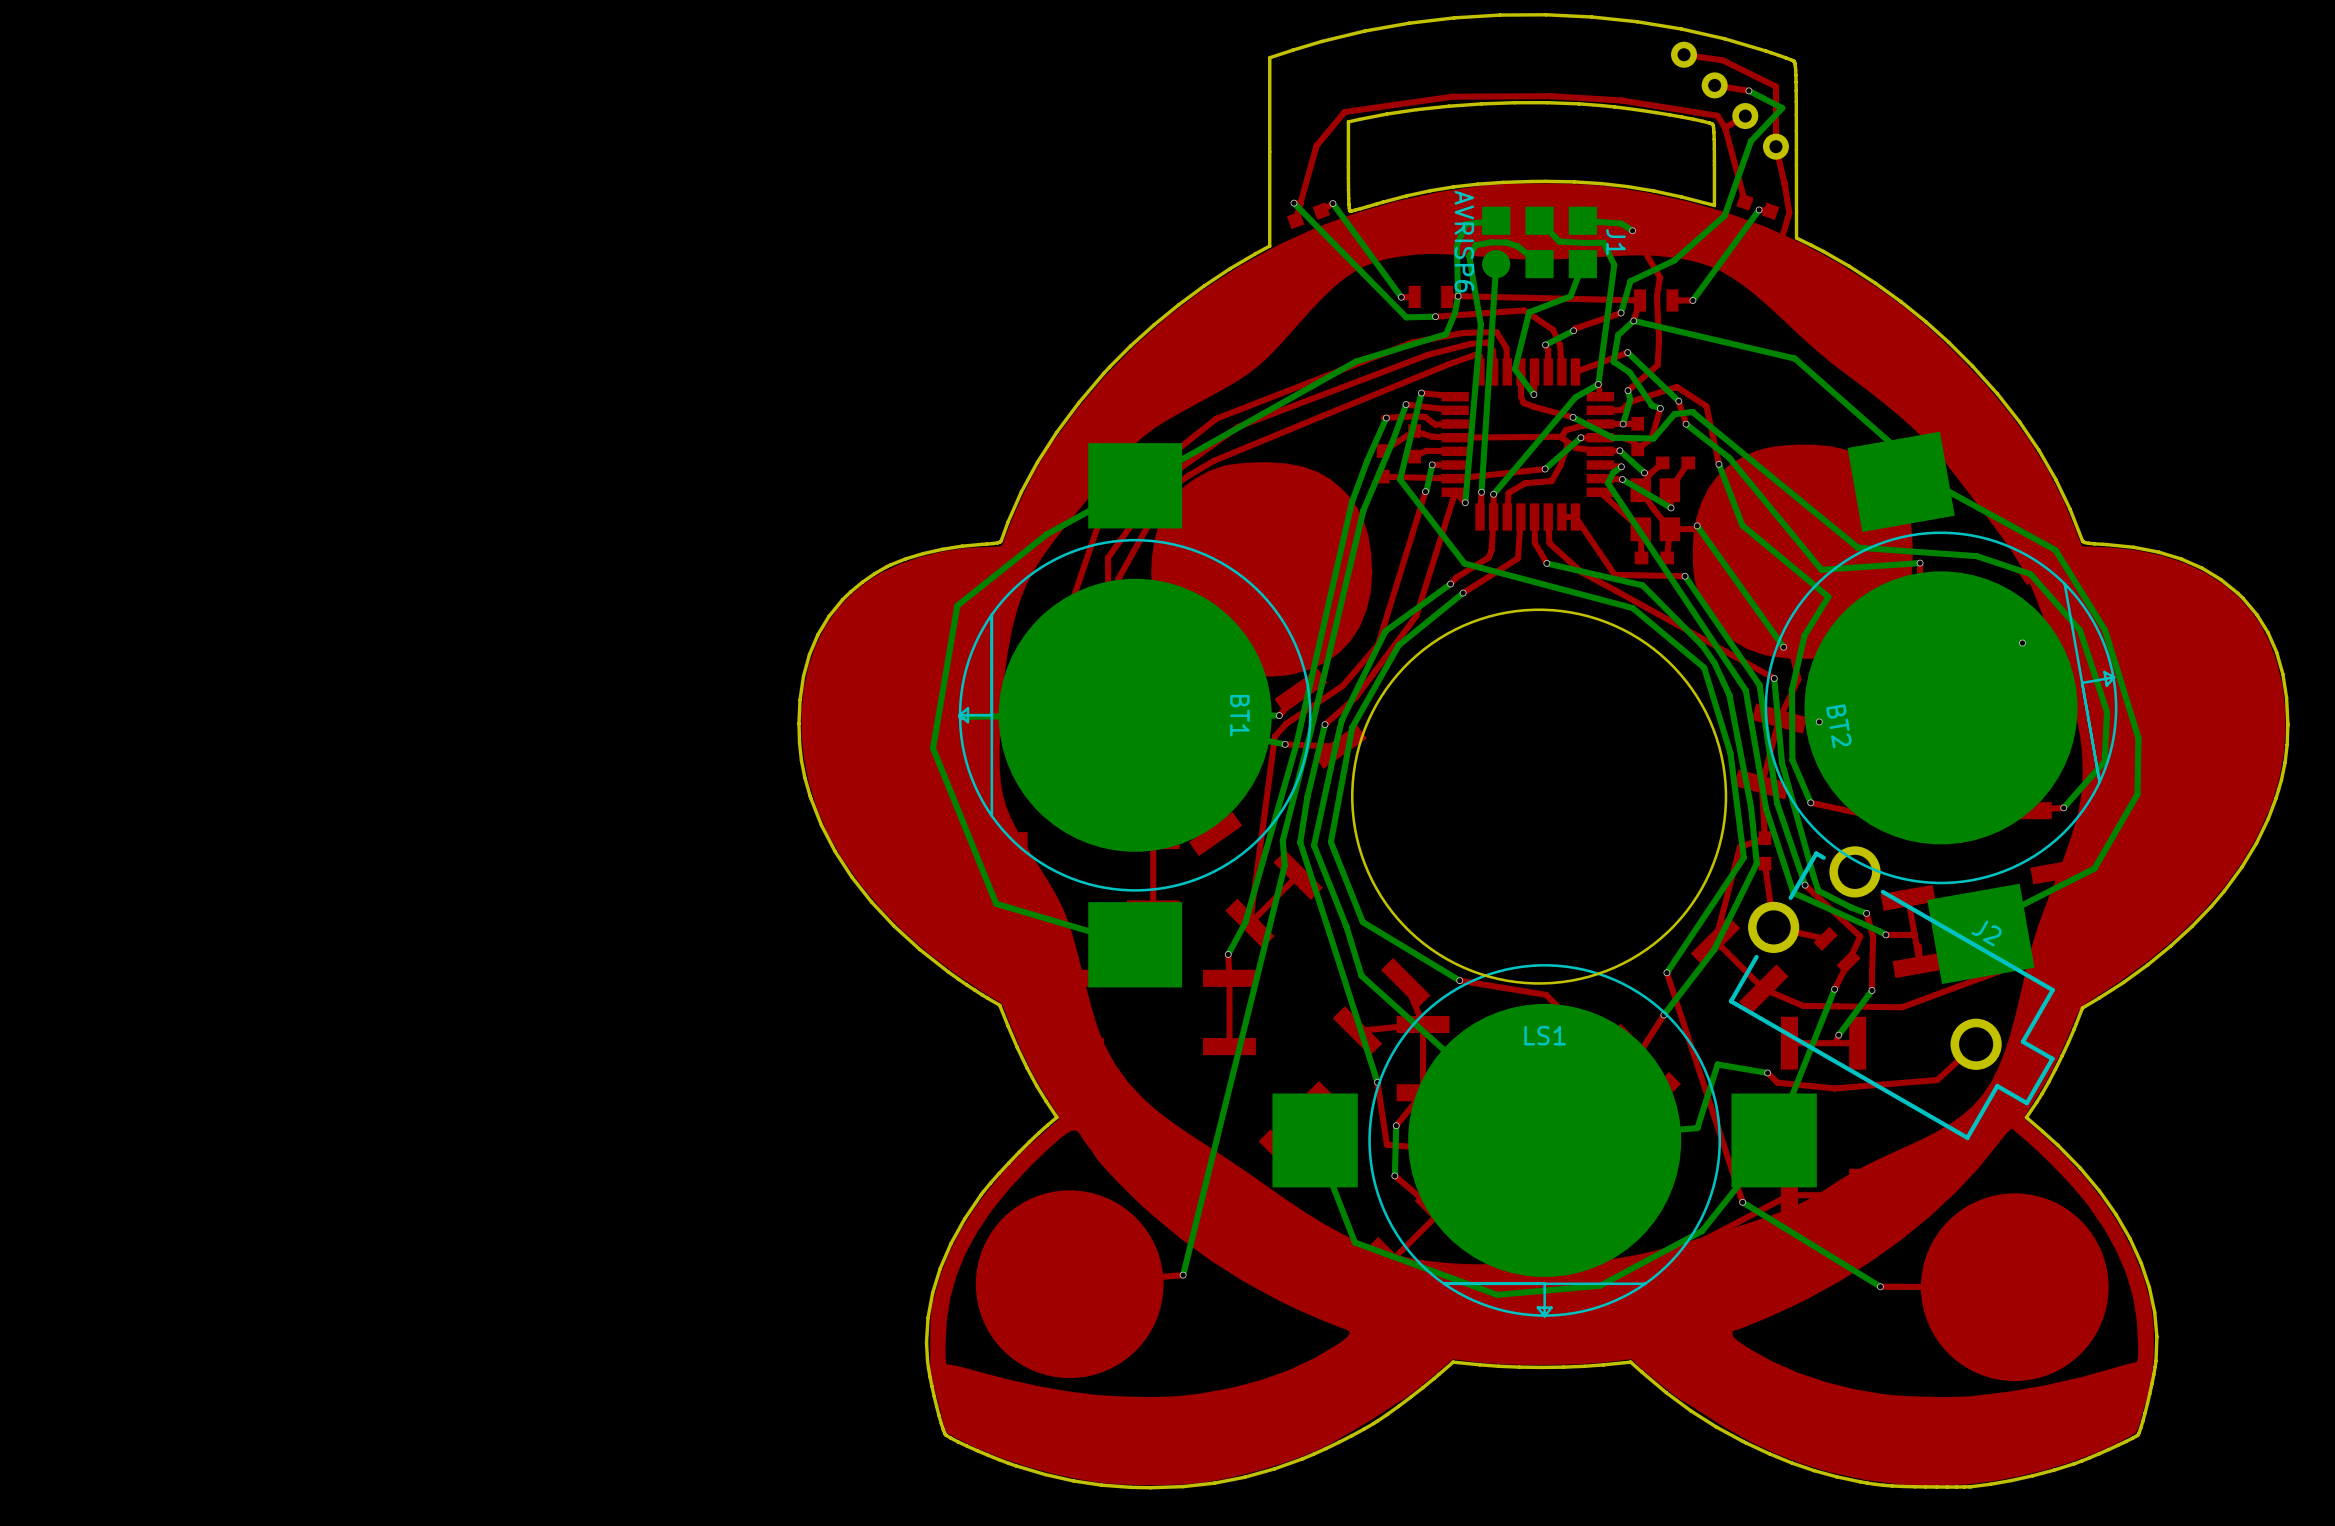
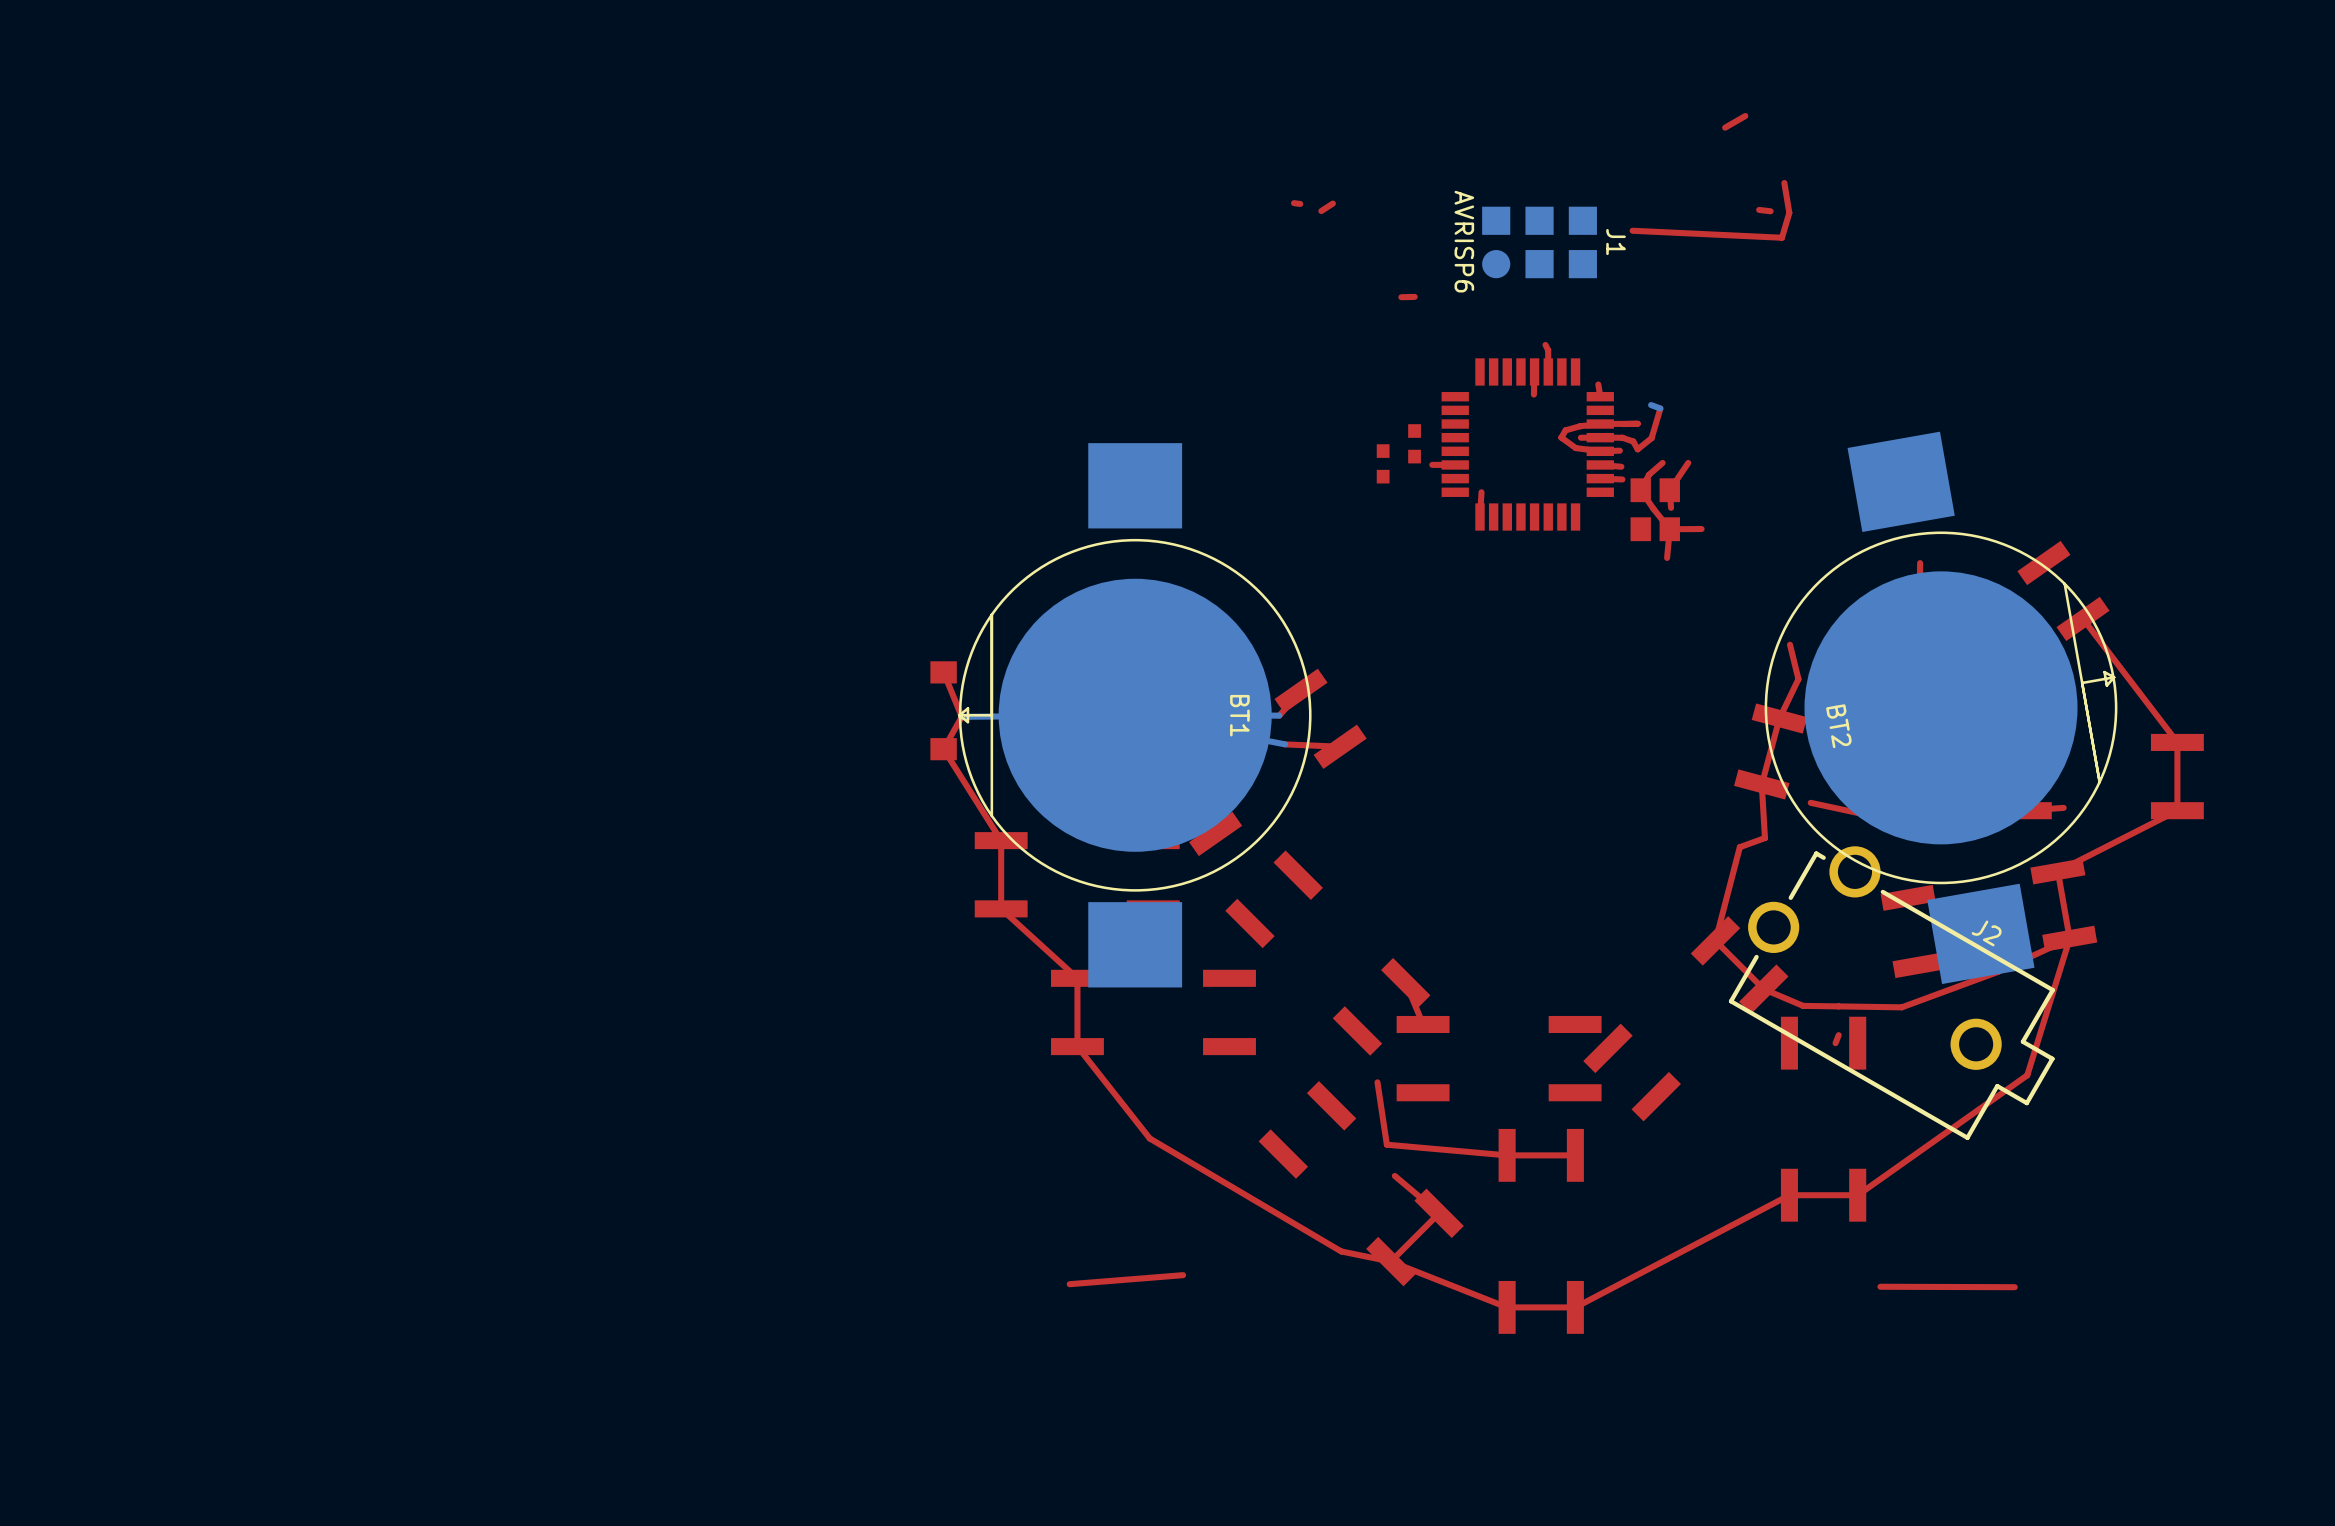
drawing: [797, 13, 2290, 1490] -> none
top track: (1684, 54) (1722, 60) (1776, 86) (1775, 146) (1785, 187) -> none
part: (1684, 54) -> none
top track: (1714, 85) (1748, 90) -> none
part: (1714, 85) -> none
bottom track: (1748, 90) (1782, 108) (1750, 141) (1724, 215) (1674, 260) (1630, 281) (1621, 313) -> none
via: (1748, 90) -> none
part: (1745, 116) -> none
part: (1775, 146) -> none
top track: (1744, 201) (1725, 127) (1717, 115) (1621, 100) (1551, 96) (1452, 96) (1344, 112) (1316, 145) (1295, 220) -> none
bottom track: (1293, 203) (1406, 317) (1435, 316) -> none
via: (1293, 203) -> none
bottom track: (1332, 203) (1401, 297) -> none
via: (1332, 203) -> none
part: (1757, 206) -> none
bottom track: (1759, 209) (1692, 300) -> none
via: (1759, 209) -> none
part: (1308, 215) -> none
bottom track: (1496, 220) (1465, 224) (1456, 246) (1458, 296) (1454, 313) (1446, 334) (1355, 361) (1046, 534) (957, 605) (933, 748) (996, 903) (1135, 944) -> none
bottom track: (1539, 220) (1559, 241) (1603, 242) (1614, 264) (1598, 384) (1575, 397) (1493, 494) -> none
bottom track: (1582, 220) (1621, 223) (1632, 230) -> none
via: (1632, 230) -> none
top track: (1633, 231) (1659, 277) (1656, 297) (1659, 339) (1657, 365) (1627, 390) -> none
bottom track: (1496, 264) (1481, 492) -> none
bottom track: (1539, 264) (1517, 246) (1506, 242) (1475, 245) (1469, 256) (1480, 324) (1465, 502) -> none
bottom track: (1582, 264) (1570, 296) (1529, 312) (1514, 369) (1533, 394) -> none
part: (1430, 296) -> none
top track: (1447, 296) (1640, 300) (1633, 320) -> none
via: (1458, 296) -> none
via: (1401, 297) -> none
part: (1656, 300) -> none
top track: (1692, 300) (1672, 300) -> none
via: (1692, 300) -> none
top track: (1621, 313) (1575, 328) -> none
via: (1621, 313) -> none
top track: (1435, 316) (1524, 310) (1553, 329) (1560, 345) (1561, 371) -> none
via: (1435, 316) -> none
via: (1633, 320) -> none
bottom track: (1573, 330) (1545, 344) -> none
via: (1573, 330) -> none
via: (1545, 344) -> none
bottom track: (1627, 352) (1678, 401) -> none
top track: (1627, 352) (1575, 371) -> none
via: (1627, 352) -> none
top track: (1479, 371) (1479, 356) (1474, 355) (1449, 363) (1214, 460) (1175, 484) (1164, 496) (1118, 578) (1130, 673) (1176, 778) (1215, 833) -> none
top track: (1493, 371) (1493, 350) (1488, 342) (1470, 343) (1427, 354) (1237, 427) (1163, 480) (1108, 557) (1108, 627) (1117, 754) (1153, 840) (1153, 908) -> none
top track: (1507, 371) (1506, 348) (1496, 332) (1463, 333) (1412, 342) (1216, 418) (1103, 508) (1071, 603) (1080, 672) (1080, 749) -> none
top track: (1520, 371) (1521, 396) (1523, 402) (1573, 417) -> none
via: (1598, 384) -> none
bottom track: (1627, 390) (1630, 399) (1623, 424) -> none
via: (1627, 390) -> none
bottom track: (1421, 393) (1400, 479) (1464, 563) (1632, 608) (1704, 667) (1730, 753) (1743, 857) (1666, 972) -> none
top track: (1421, 393) (1455, 396) -> none
via: (1421, 393) -> none
via: (1533, 394) -> none
top track: (1678, 401) (1686, 424) -> none
via: (1678, 401) -> none
bottom track: (1406, 404) (1363, 510) (1282, 840) (1284, 865) (1183, 1275) -> none
top track: (1406, 404) (1455, 410) -> none
via: (1406, 404) -> none
bottom track: (1651, 405) (1630, 372) (1613, 361) (1618, 335) (1633, 320) (1794, 358) (1940, 487) (2055, 550) (2105, 630) (2138, 737) (2137, 794) (2094, 868) (1940, 946) -> none
via: (1660, 408) -> none
top track: (1600, 410) (1620, 410) (1631, 401) (1676, 386) (1706, 406) (1718, 464) -> none
bottom track: (1692, 412) (1674, 414) (1653, 438) (1612, 437) (1573, 417) -> none
bottom track: (1692, 412) (1857, 547) (1976, 556) (2030, 574) (2080, 630) (2107, 711) (2104, 761) (2063, 807) -> none
via: (1573, 417) -> none
bottom track: (1386, 418) (1367, 460) (1351, 502) (1296, 745) (1245, 922) (1228, 954) -> none
top track: (1386, 418) (1384, 417) (1425, 416) (1435, 424) (1455, 424) -> none
via: (1386, 418) -> none
via: (1623, 424) -> none
bottom track: (1686, 424) (1729, 457) (1821, 569) (1920, 563) -> none
via: (1686, 424) -> none
top track: (1561, 436) (1432, 436) (1414, 431) (1383, 451) -> none
part: (1637, 436) -> none
bottom track: (1580, 437) (1545, 469) -> none
via: (1580, 437) -> none
top track: (1568, 442) (1560, 465) (1551, 481) (1525, 483) (1508, 493) (1507, 517) -> none
bottom track: (1619, 450) (1644, 472) -> none
via: (1619, 450) -> none
top track: (1455, 451) (1426, 450) (1414, 456) -> none
part: (1675, 462) -> none
bottom track: (1432, 464) (1425, 491) -> none
via: (1432, 464) -> none
bottom track: (1718, 464) (1742, 525) (1828, 596) (1804, 635) (1791, 690) -> none
via: (1718, 464) -> none
bottom track: (1621, 466) (1613, 472) (1607, 483) (1745, 690) (1766, 809) (1793, 893) (1885, 934) -> none
via: (1621, 466) -> none
top track: (1545, 469) (1455, 478) (1383, 476) -> none
via: (1545, 469) -> none
via: (1644, 472) -> none
bottom track: (1622, 479) (1671, 507) -> none
via: (1622, 479) -> none
top track: (1425, 491) (1378, 644) (1342, 685) (1286, 723) (1274, 736) (1249, 923) (1298, 875) -> none
via: (1425, 491) -> none
via: (1481, 492) -> none
top track: (1600, 492) (1640, 529) (1641, 557) -> none
top track: (1493, 494) (1491, 550) (1488, 557) (1456, 577) (1450, 583) -> none
via: (1493, 494) -> none
top track: (1465, 502) (1455, 492) (1416, 616) (1355, 697) (1325, 724) -> none
via: (1465, 502) -> none
via: (1671, 507) -> none
top track: (1520, 517) (1517, 558) (1463, 593) -> none
top track: (1534, 517) (1534, 542) (1546, 563) -> none
top track: (1548, 517) (1549, 543) (1581, 572) (1774, 678) -> none
top track: (1561, 517) (1575, 517) (1614, 574) (1685, 576) -> none
bottom track: (1697, 525) (1783, 647) -> none
via: (1697, 525) -> none
part: (1654, 557) -> none
bottom track: (1546, 563) (1642, 585) (1702, 645) (1714, 662) (1729, 695) (1751, 807) (1756, 863) (1713, 950) (1663, 1015) -> none
via: (1546, 563) -> none
via: (1920, 563) -> none
bottom track: (1685, 576) (1759, 685) (1777, 803) (1805, 885) -> none
via: (1685, 576) -> none
bottom track: (1450, 583) (1385, 631) (1341, 720) (1335, 746) (1314, 845) (1346, 926) (1361, 975) (1544, 1140) (1697, 1128) (1717, 1064) (1767, 1072) -> none
via: (1450, 583) -> none
bottom track: (1463, 593) (1398, 645) (1352, 727) (1330, 842) (1362, 922) (1459, 980) -> none
via: (1463, 593) -> none
round board edge: [1350, 608, 1728, 985] -> none
via: (2022, 643) -> none
via: (1783, 647) -> none
bottom track: (1774, 678) (1781, 762) (1818, 890) (1866, 913) -> none
via: (1774, 678) -> none
bottom track: (1792, 690) (1792, 760) (1810, 802) -> none
via: (1279, 715) -> none
via: (1819, 721) -> none
bottom track: (1325, 724) (1307, 797) (1300, 842) (1377, 1082) -> none
via: (1325, 724) -> none
via: (1285, 744) -> none
via: (1810, 802) -> none
via: (2063, 807) -> none
part: (1764, 850) -> none
top track: (1764, 863) (1773, 927) (1825, 938) -> none
top track: (1805, 885) (1860, 936) (1834, 989) -> none
via: (1805, 885) -> none
top track: (1908, 897) (1919, 965) (1918, 946) -> none
top track: (1866, 913) (1873, 936) (1871, 990) -> none
via: (1866, 913) -> none
via: (1885, 934) -> none
top track: (1914, 934) (1885, 934) -> none
part: (1837, 950) -> none
top track: (1228, 954) (1229, 1046) -> none
via: (1228, 954) -> none
top track: (1666, 972) (1742, 1202) -> none
via: (1666, 972) -> none
top track: (1459, 980) (1546, 994) (1575, 1024) (1575, 1092) -> none
via: (1459, 980) -> none
bottom track: (1834, 989) (1774, 1140) (1702, 1230) (1600, 1285) (1497, 1294) (1354, 1242) (1315, 1140) -> none
via: (1834, 989) -> none
bottom track: (1871, 990) (1838, 1035) -> none
via: (1871, 990) -> none
top track: (1663, 1015) (1629, 1069) -> none
via: (1663, 1015) -> none
top track: (1357, 1030) (1423, 1024) (1423, 1092) (1396, 1125) -> none
via: (1838, 1035) -> none
top track: (1857, 1043) (1789, 1043) -> none
top track: (1976, 1044) (1937, 1080) (1834, 1088) (1777, 1082) (1767, 1072) -> none
via: (1767, 1072) -> none
via: (1377, 1082) -> none
bottom track: (1396, 1125) (1394, 1175) -> none
via: (1396, 1125) -> none
LS1: (1544, 1140) -> none
via: (1394, 1175) -> none
bottom track: (1742, 1202) (1880, 1286) -> none
via: (1742, 1202) -> none
via: (1183, 1275) -> none
part: (1069, 1284) -> none
via: (1880, 1286) -> none
part: (2014, 1287) -> none

